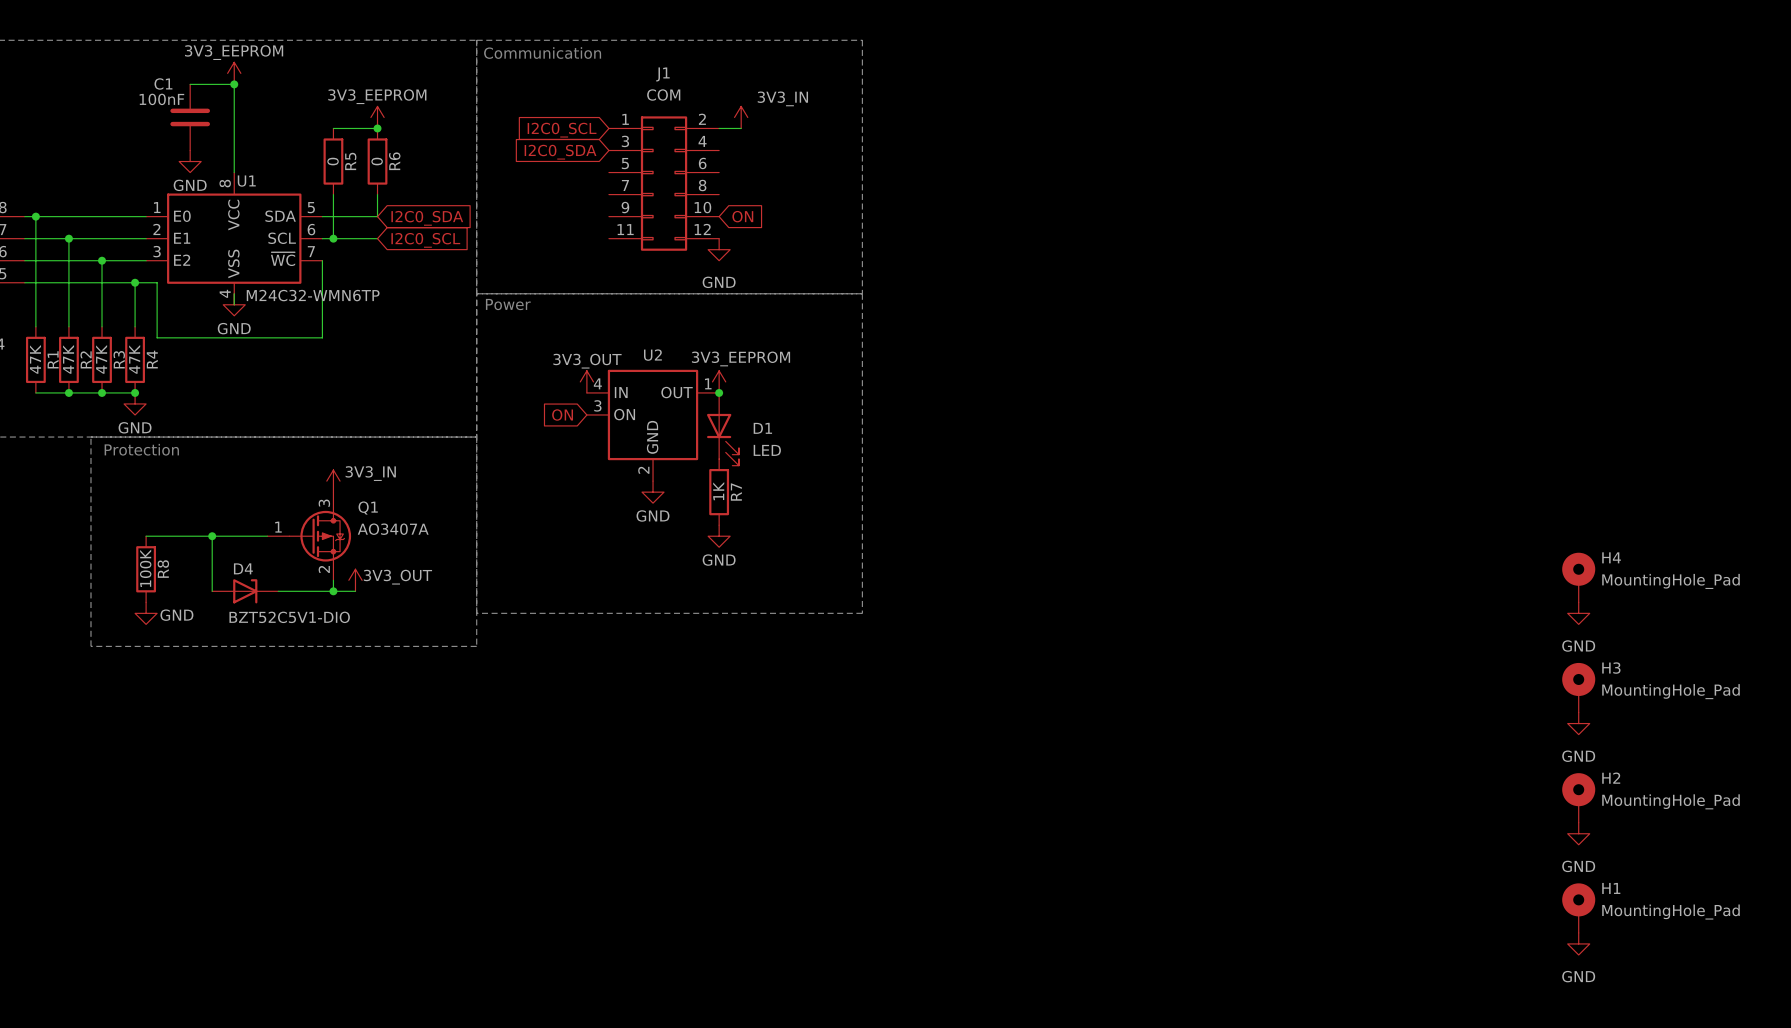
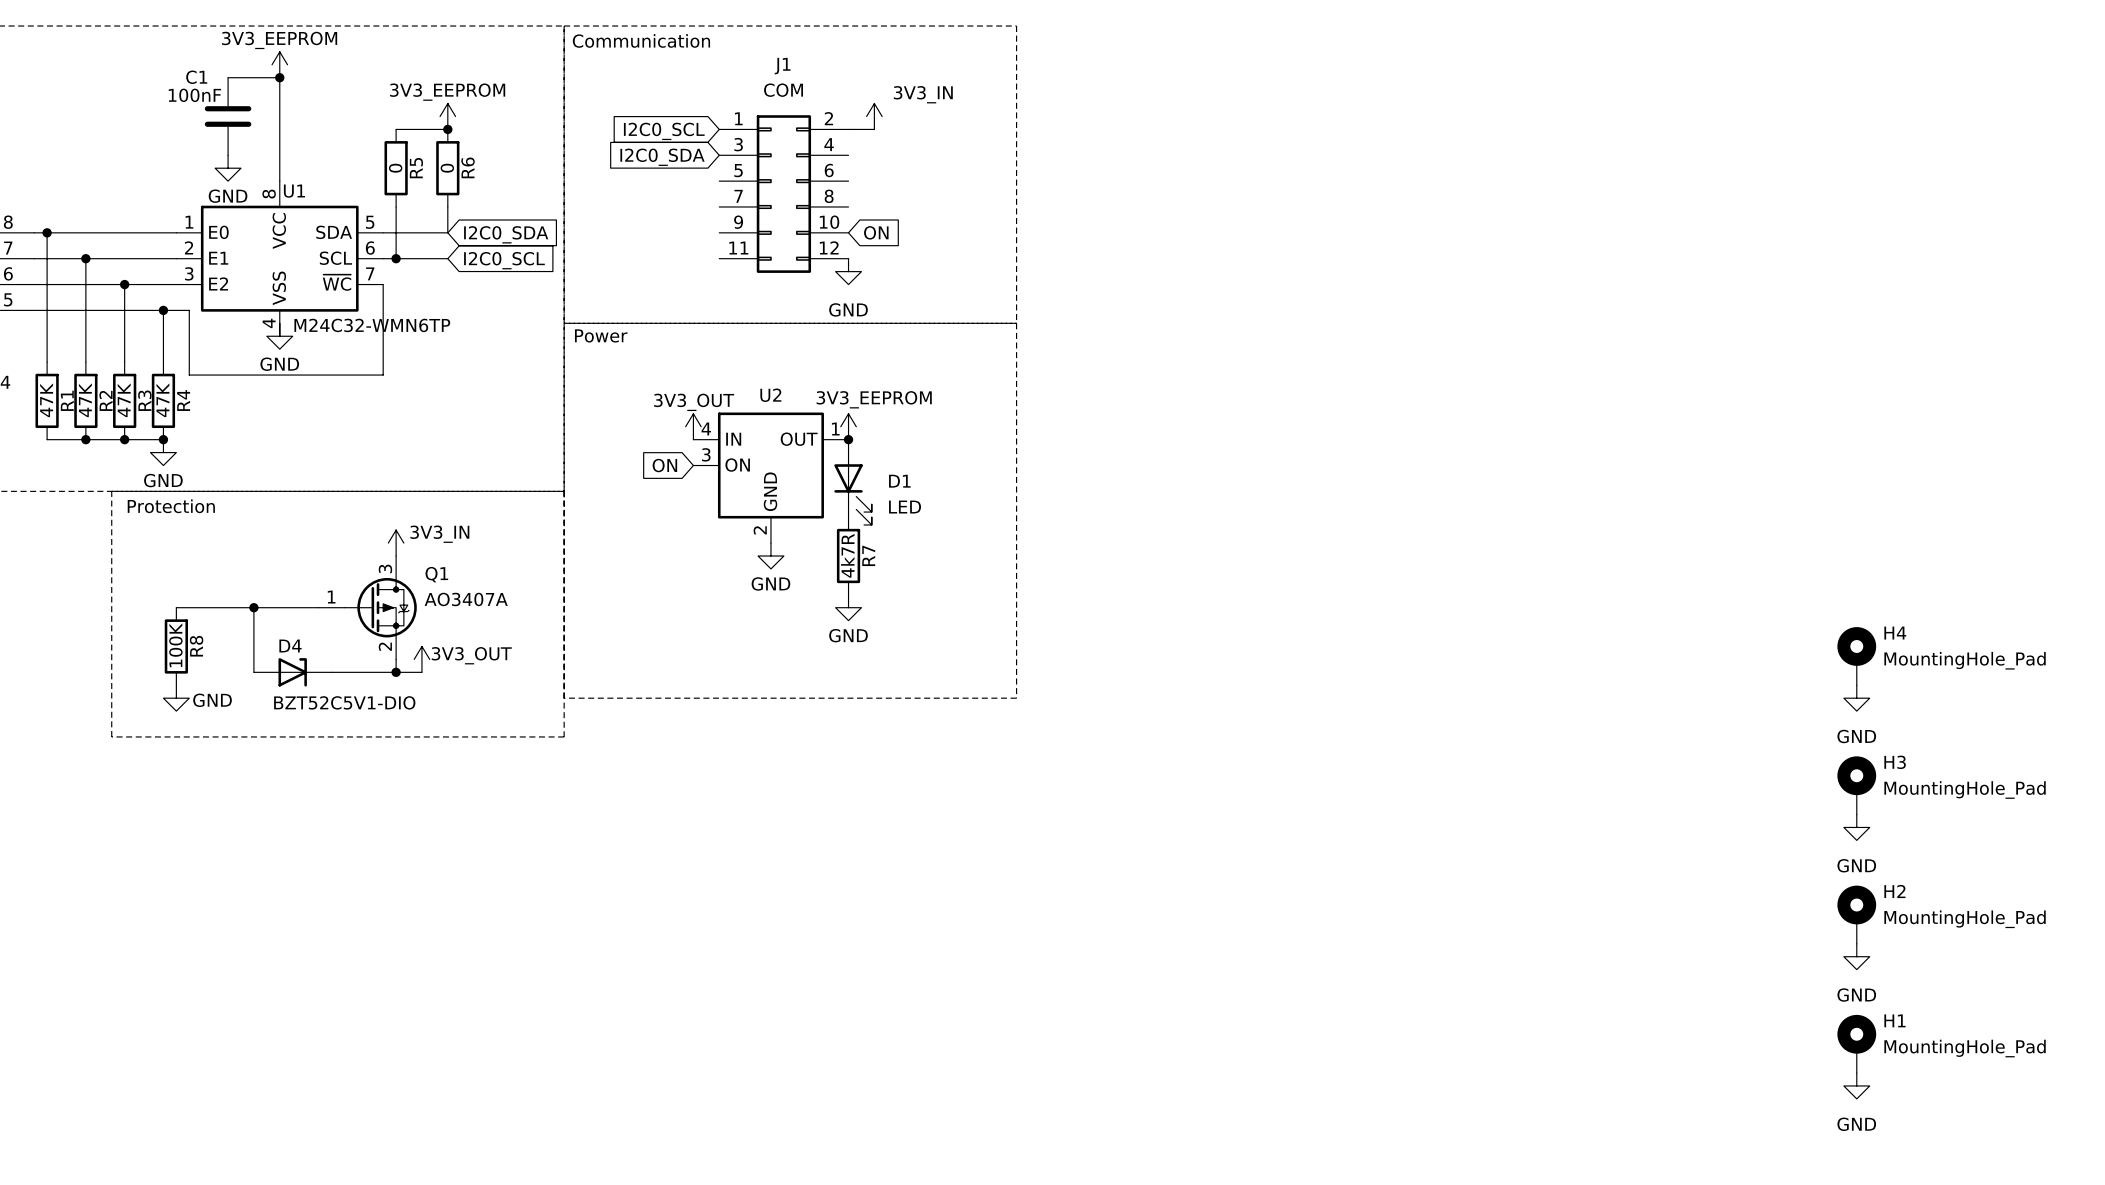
R7 value: 1K (718, 491) -> 4k7R (847, 555)

